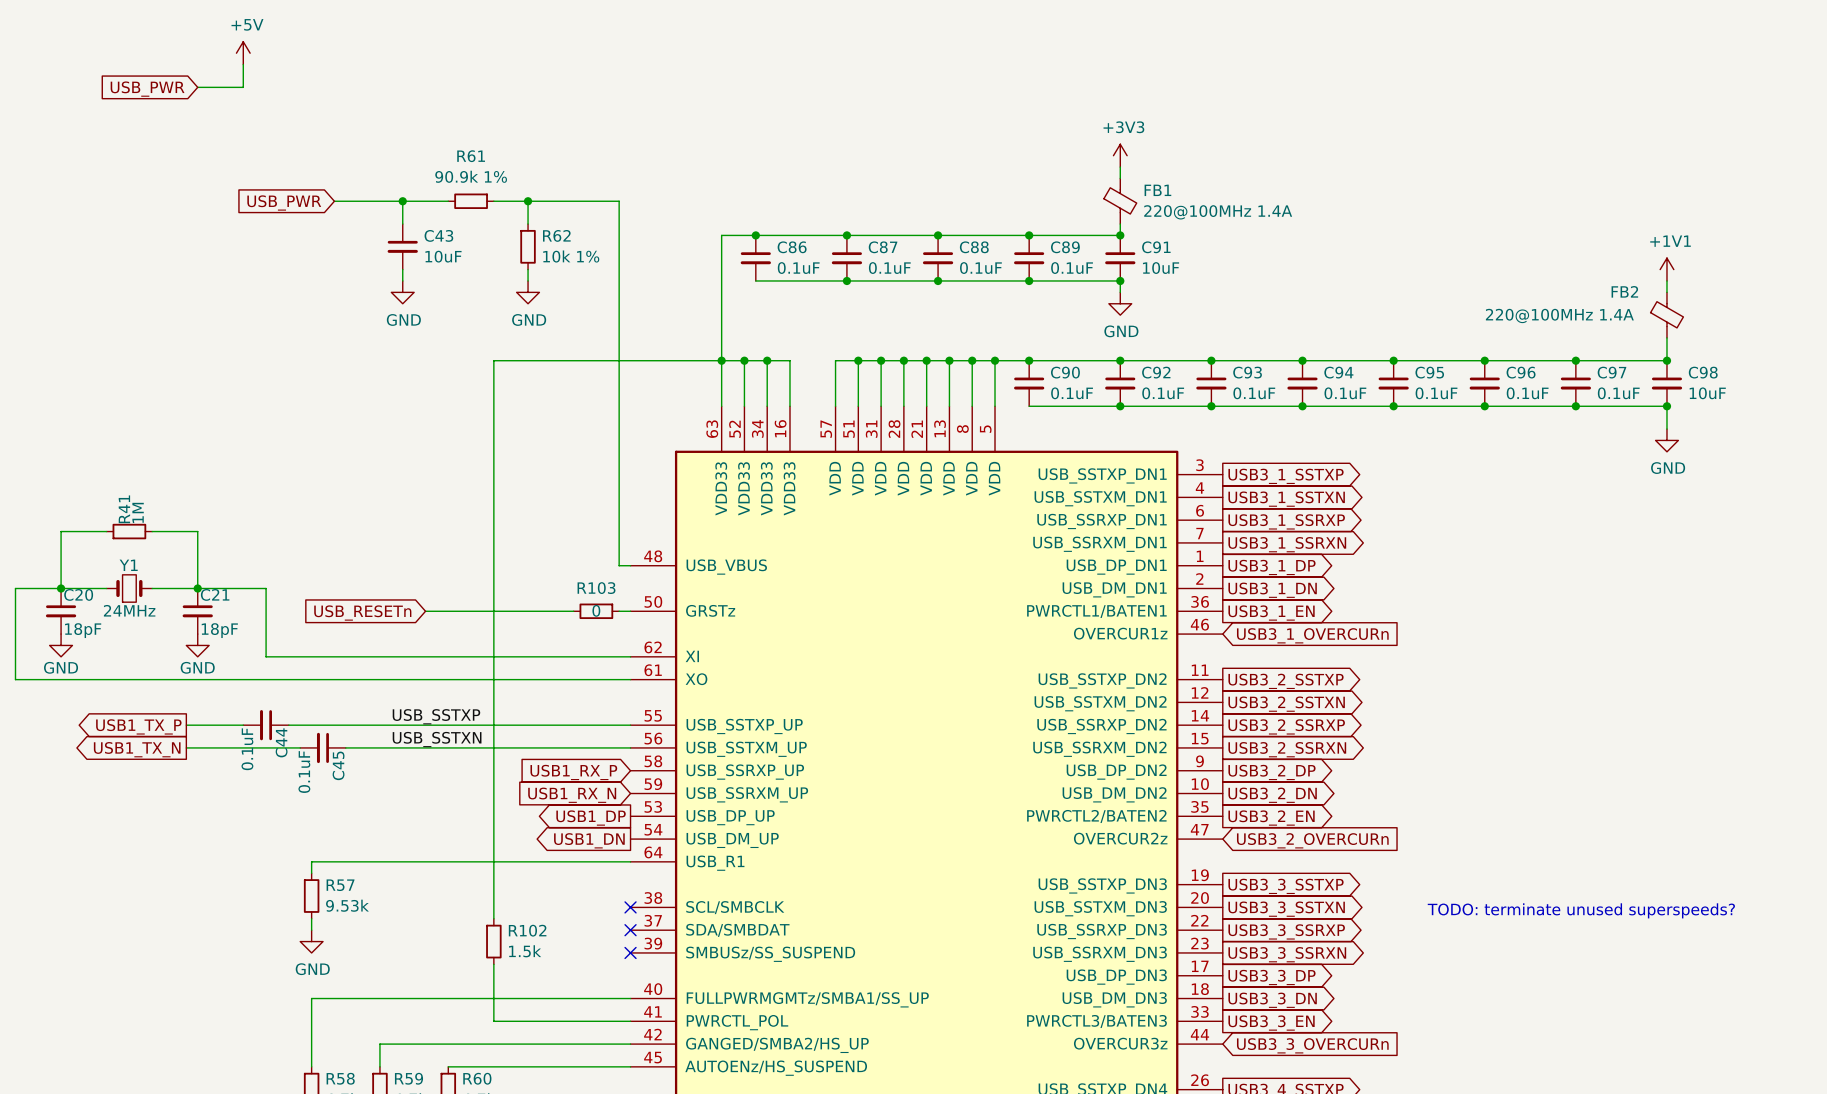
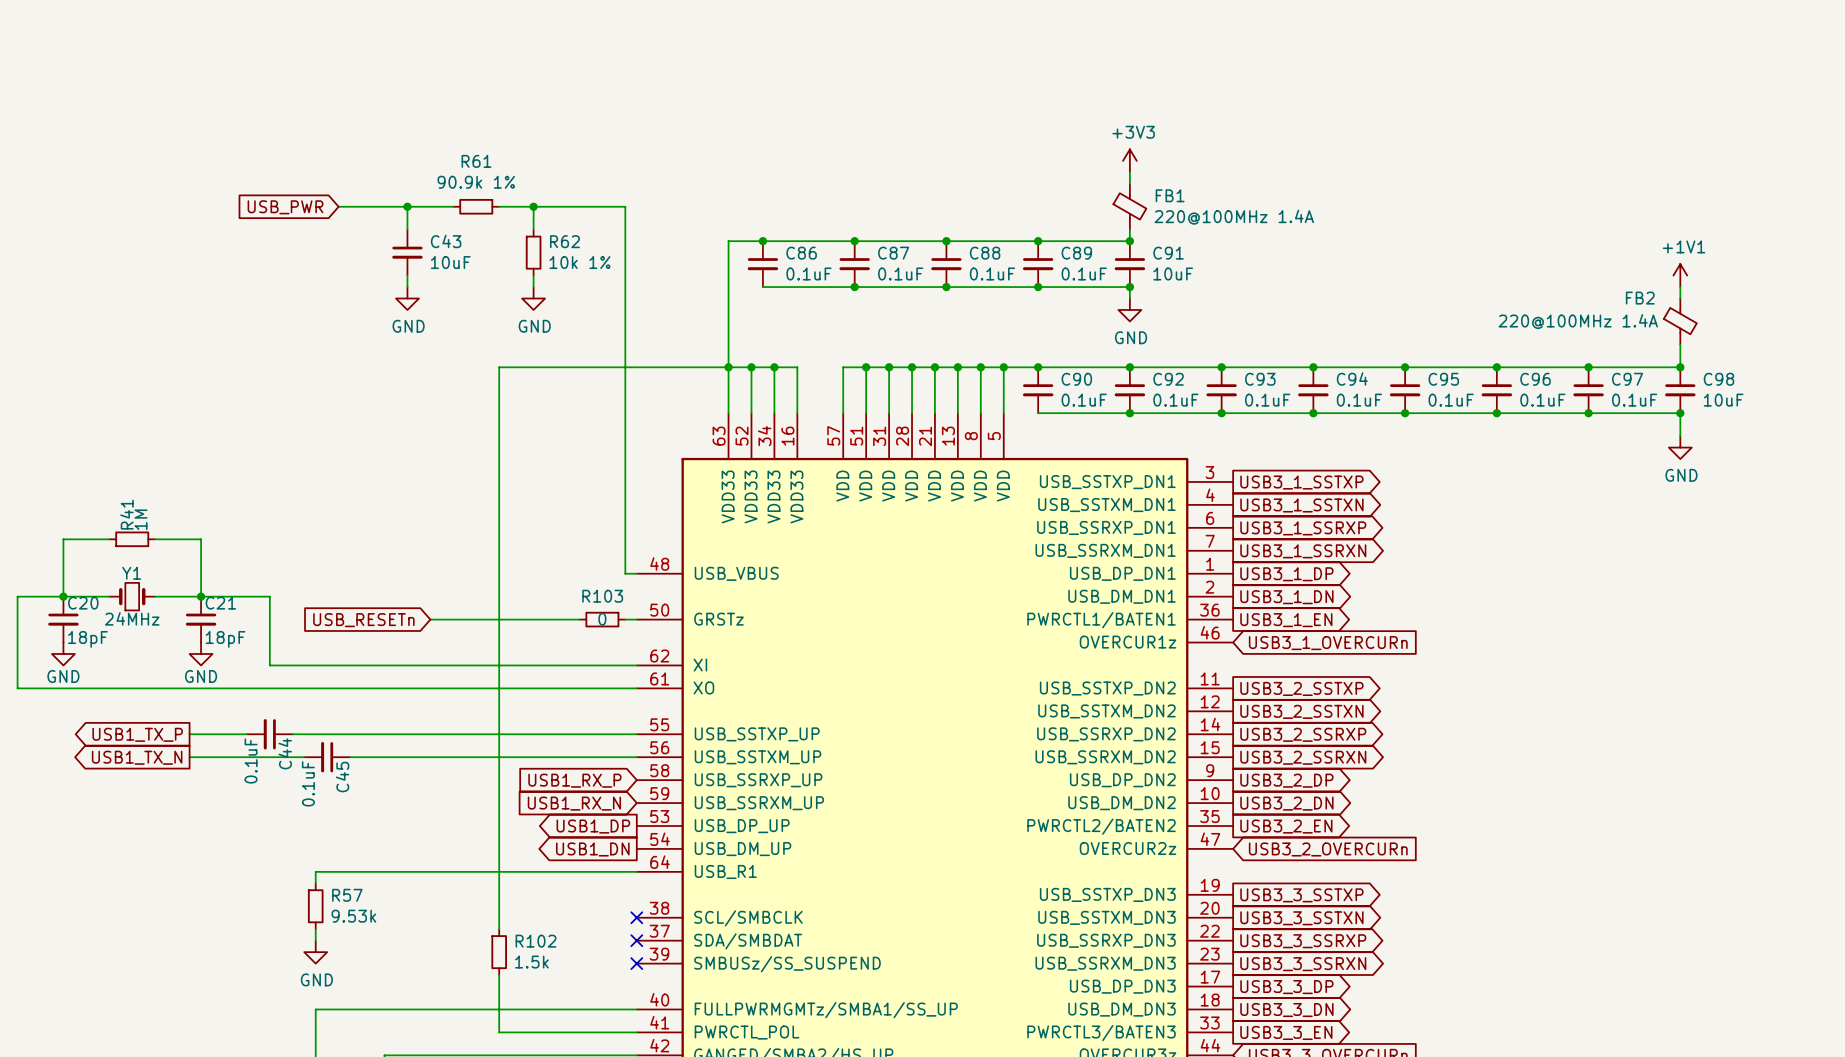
power symbol: +5V (243, 53) -> none
wire: (243, 64) (243, 87) (197, 87) -> none
global label: USB_PWR (147, 89) -> none
label: USB_SSTXP (436, 716) -> none
label: USB_SSTXN (437, 739) -> none
text: TODO: terminate unused superspeeds? (1581, 910) -> none

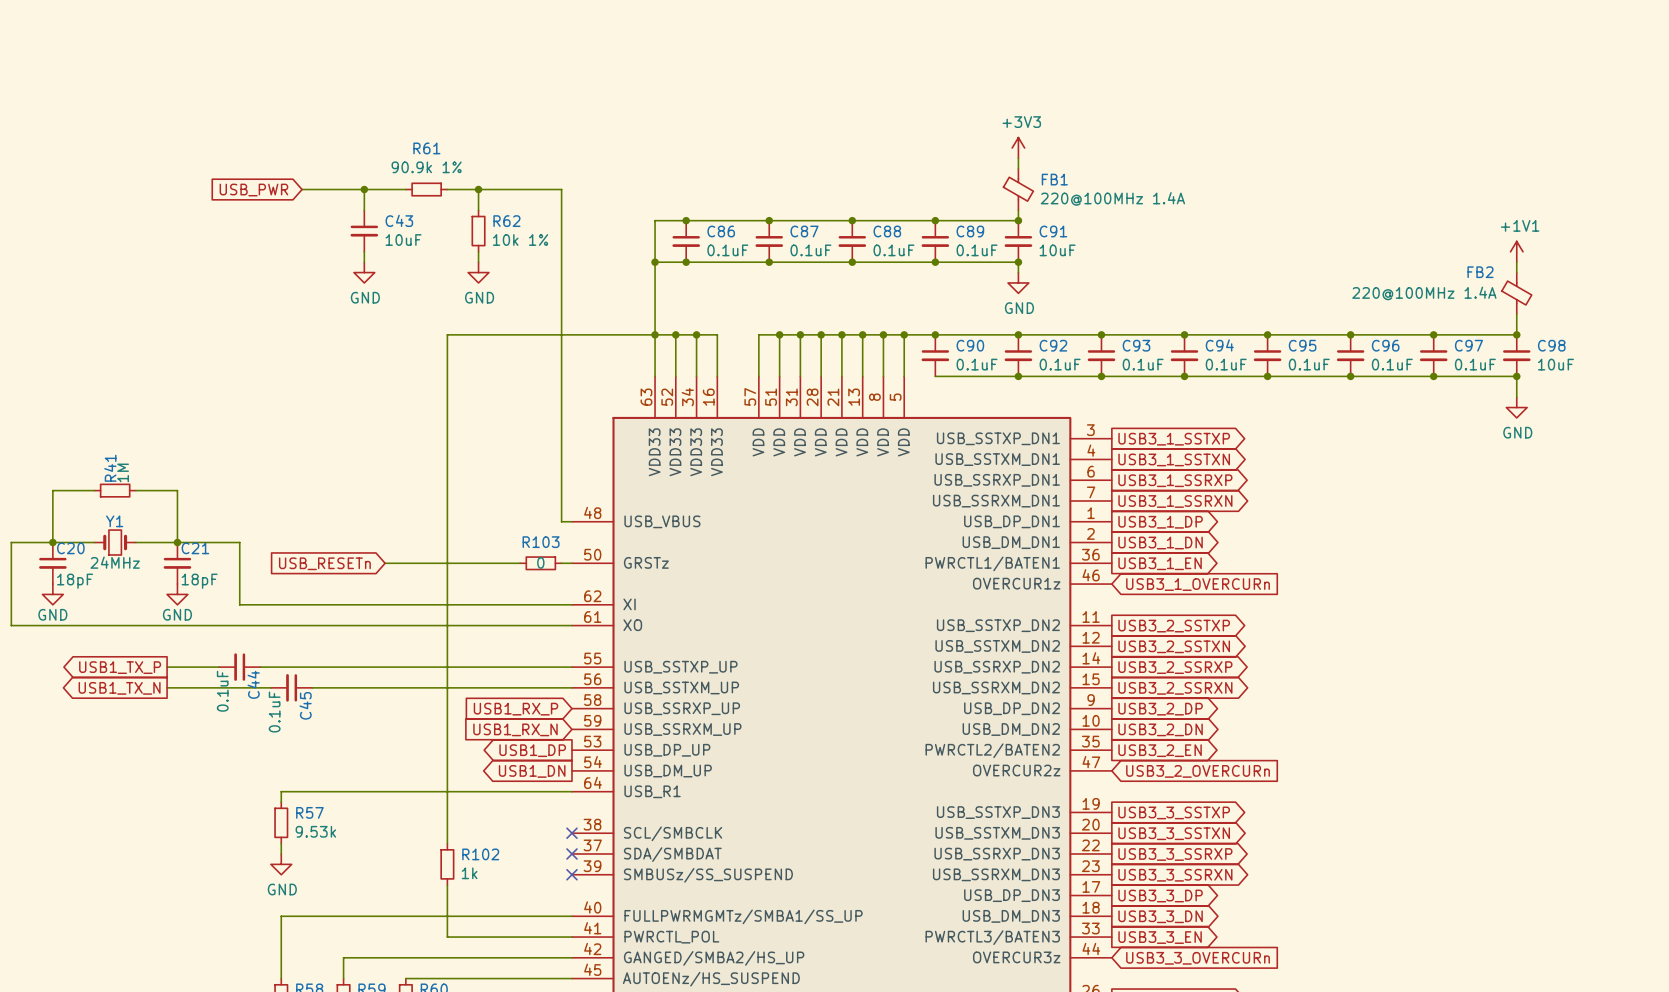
wire: none -> (655, 262) (686, 262)
junction: none -> (655, 262)
junction: none -> (686, 262)
R102 value: 1.5k (531, 962) -> 1k (469, 873)

